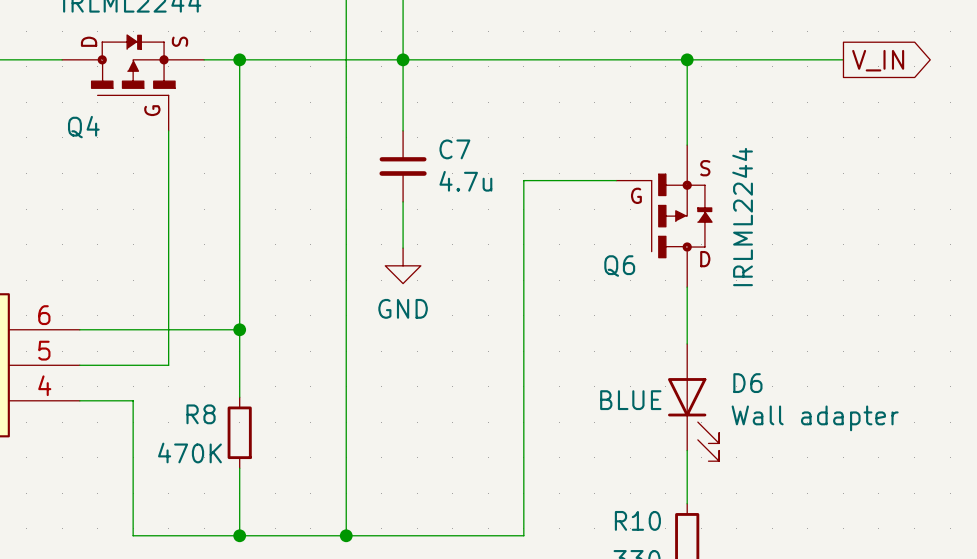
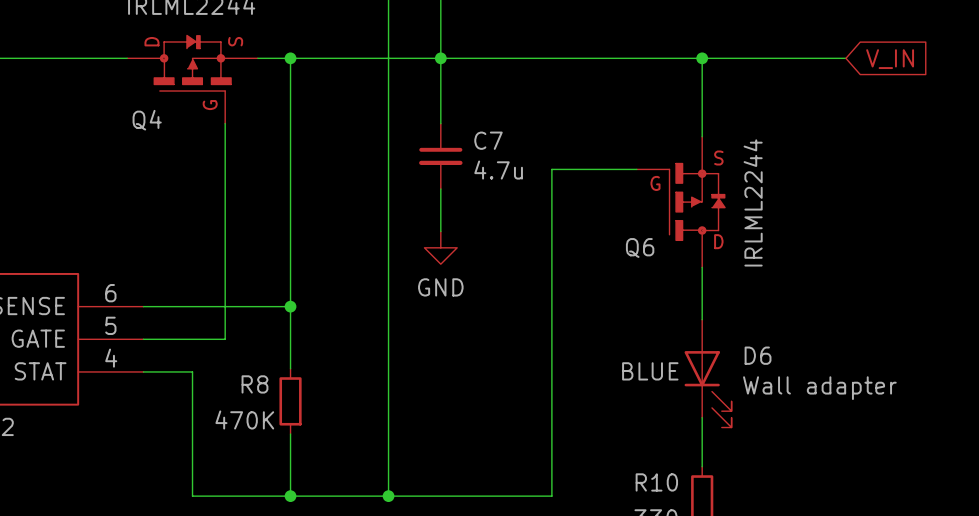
global label shape: output (878, 60) -> input (890, 59)

